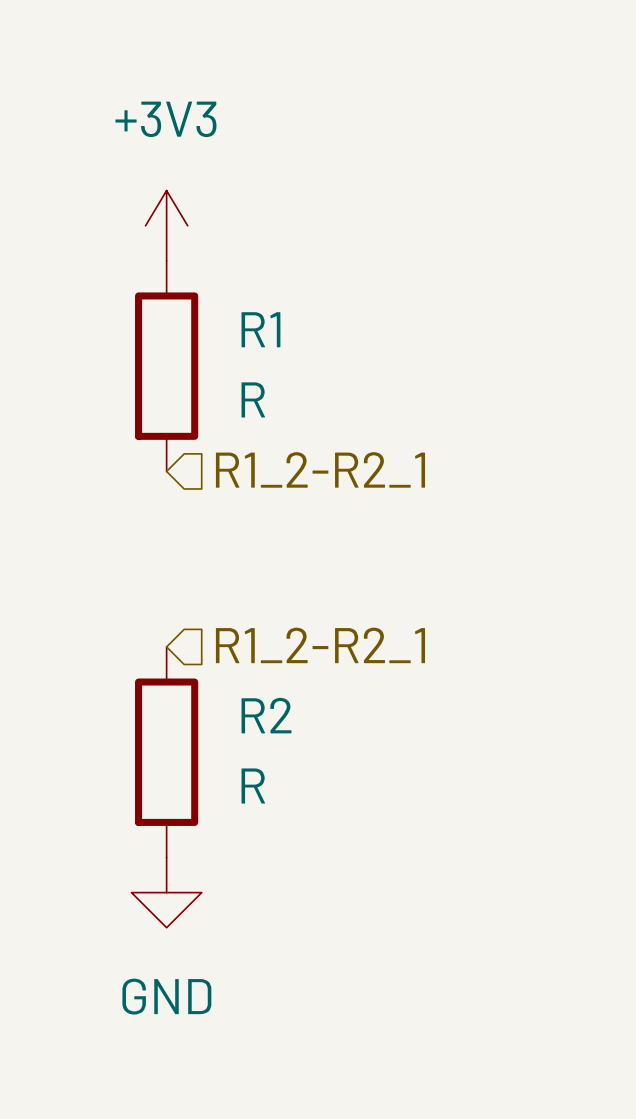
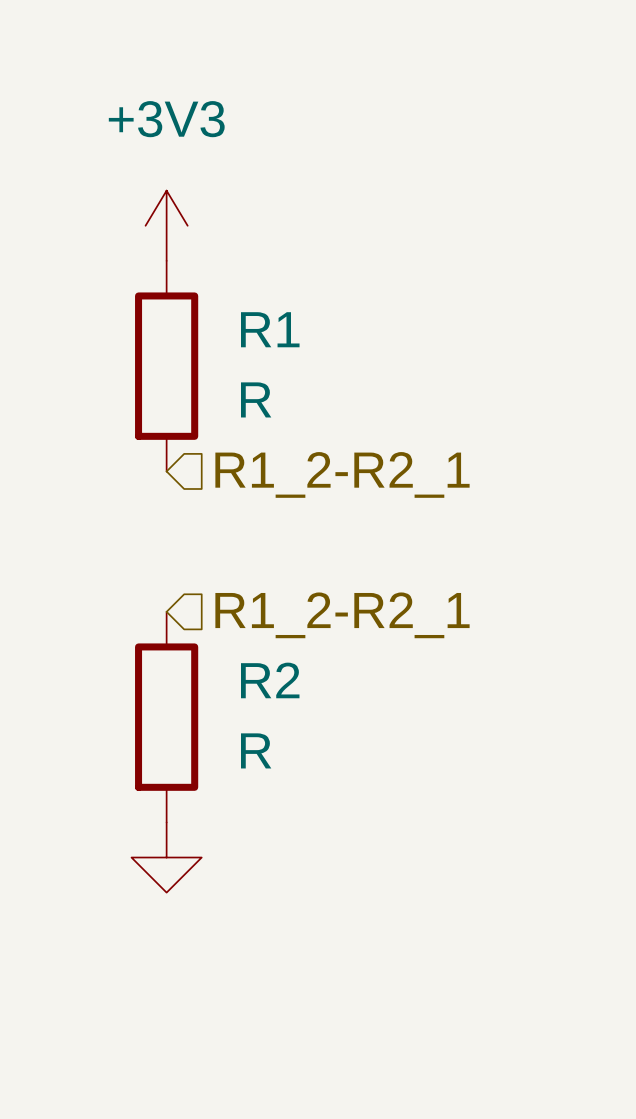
hierarchical label position: R1_2-R2_1 (320, 645) -> R1_2-R2_1 (342, 615)
R2 position: (166, 752) -> (166, 717)
power symbol: none -> (166, 857)
power symbol: GND (166, 892) -> none

